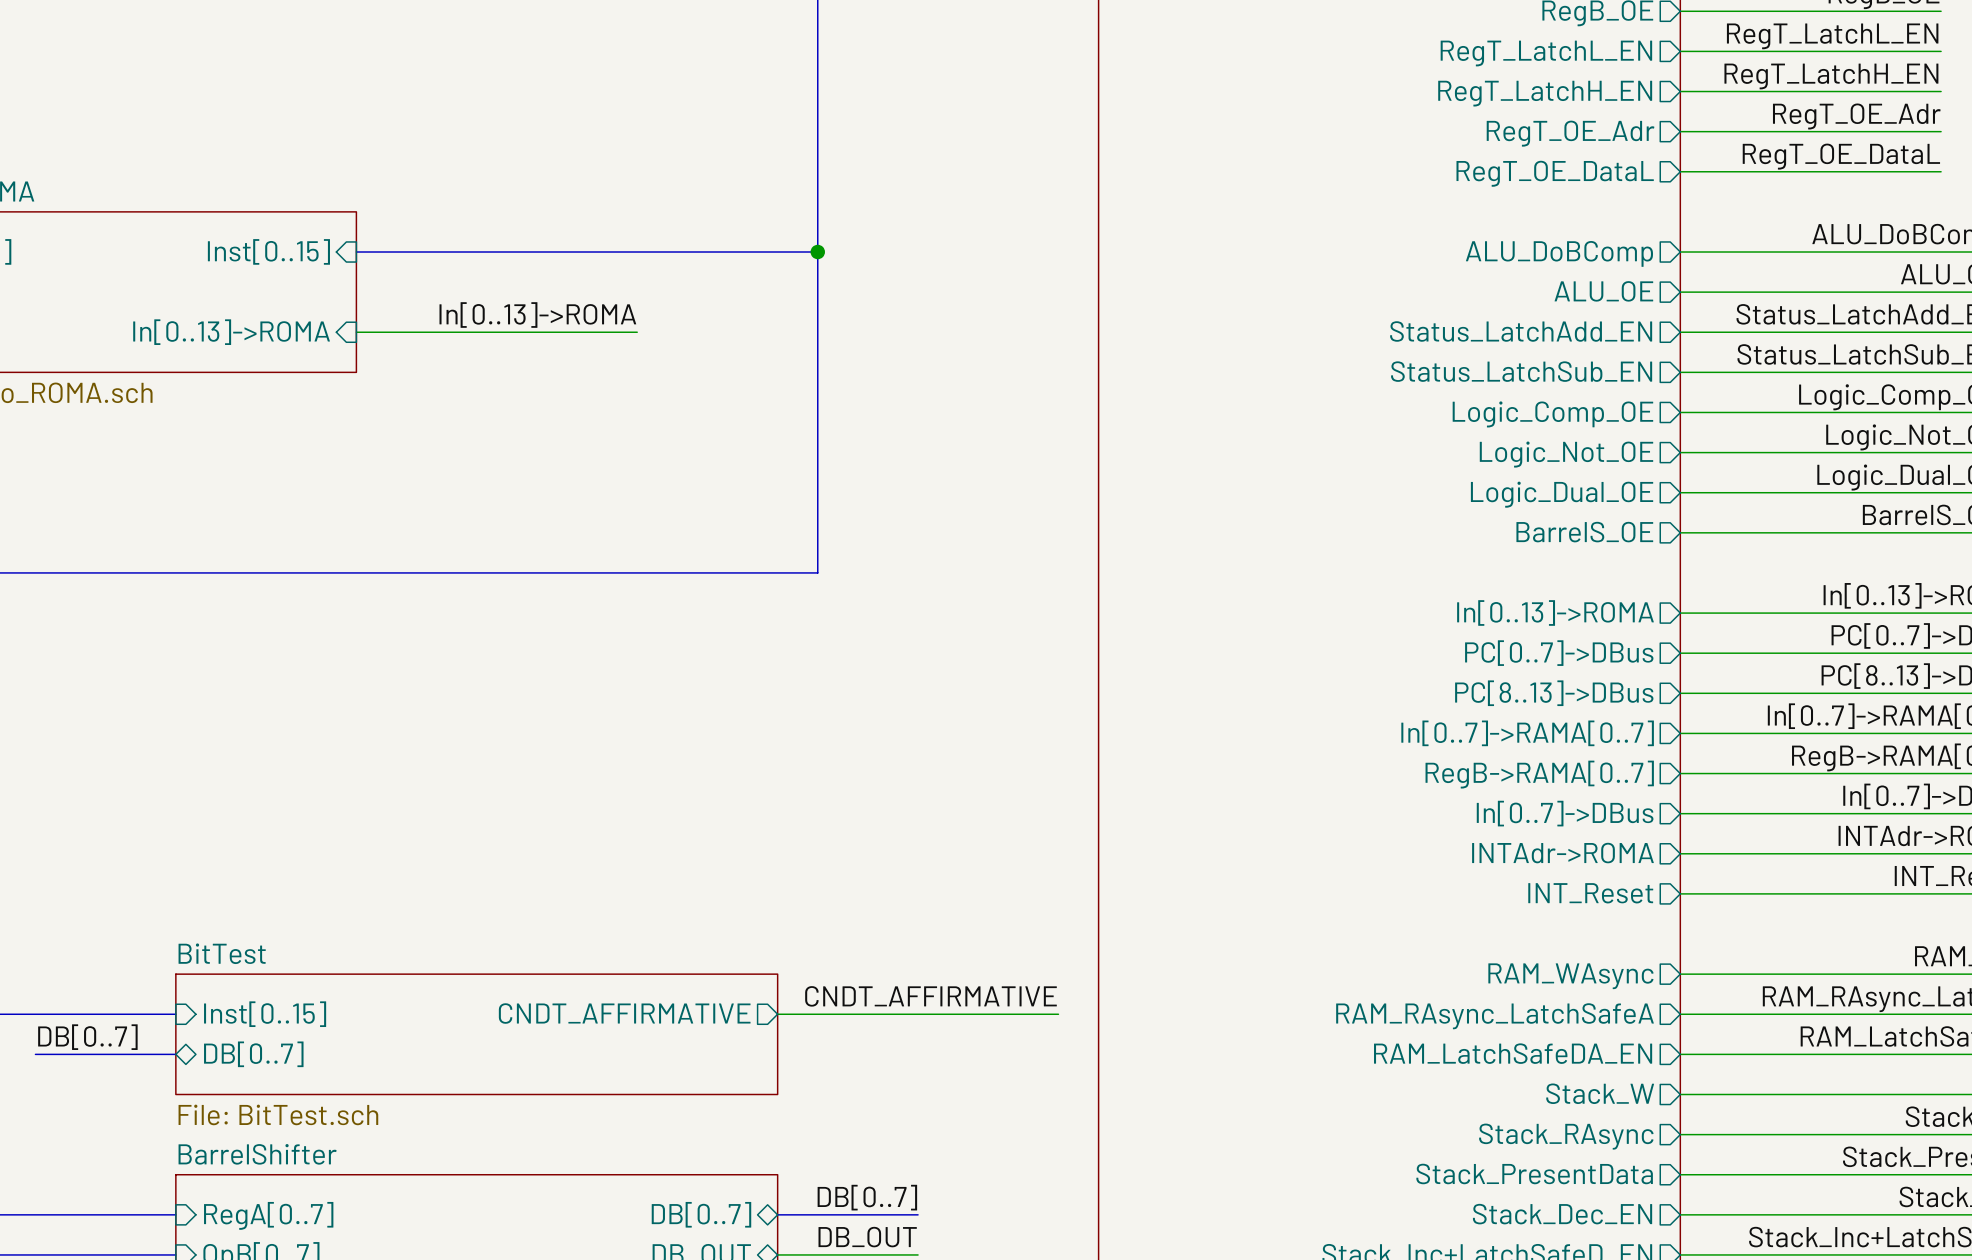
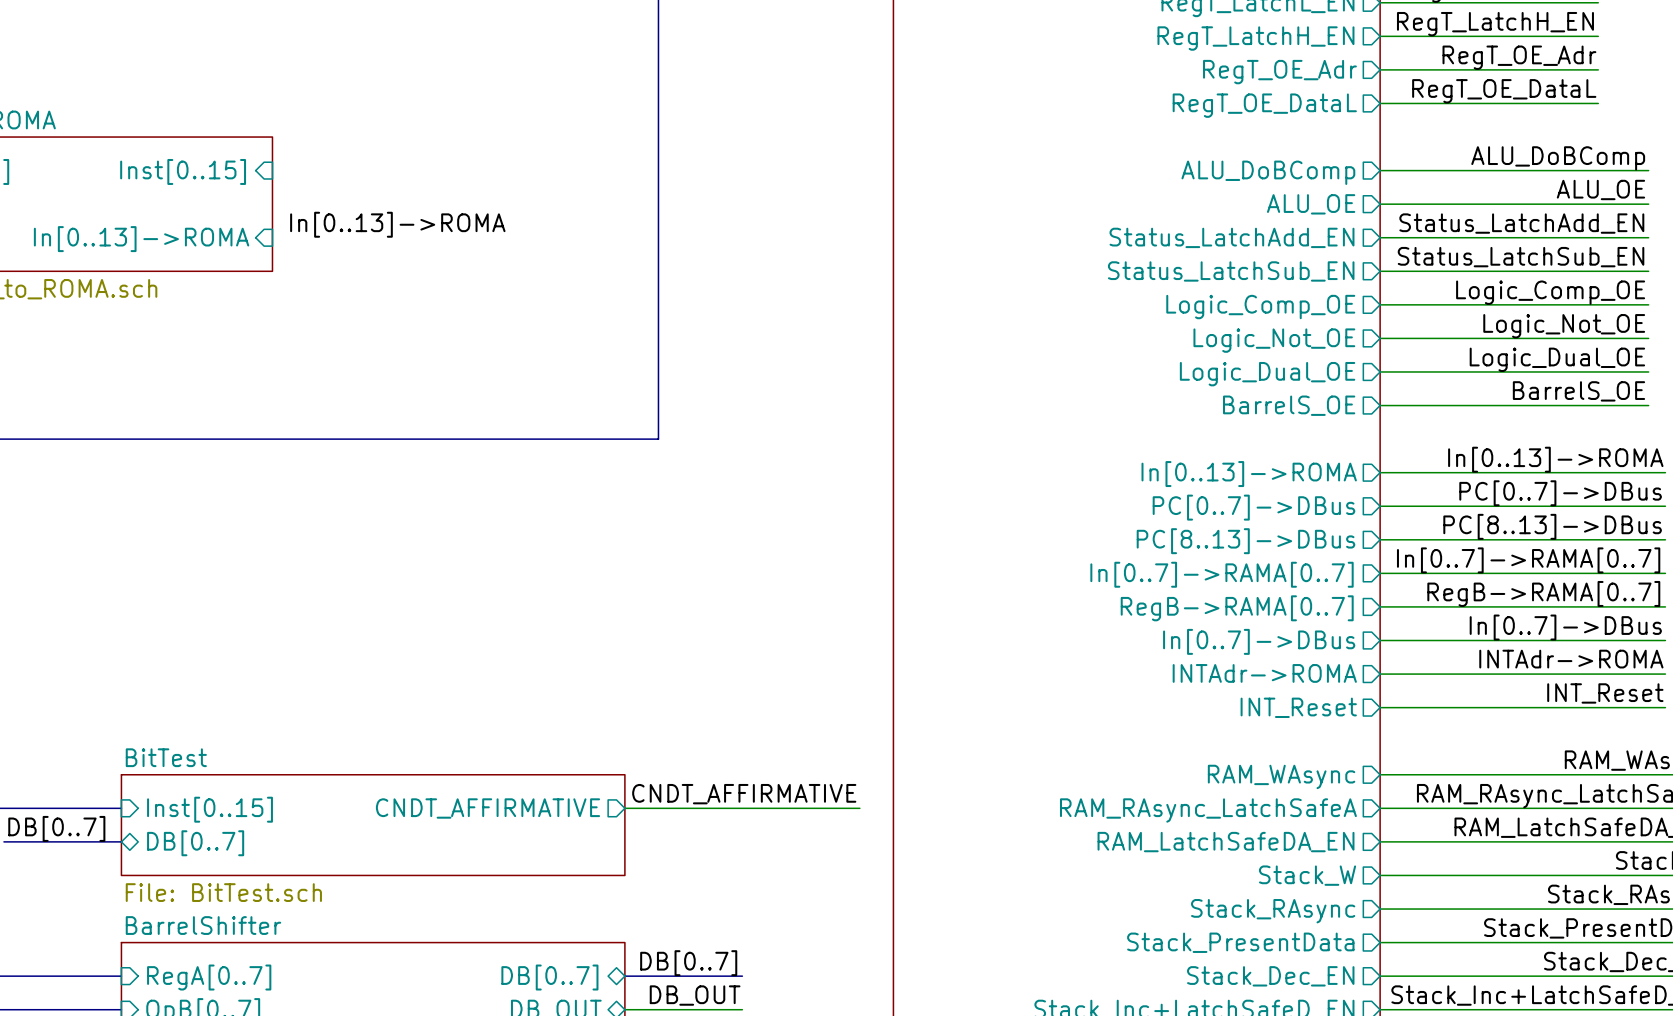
bus: (356, 252) (817, 252) -> none
junction: (817, 252) -> none
wire: (356, 332) (637, 332) -> none

